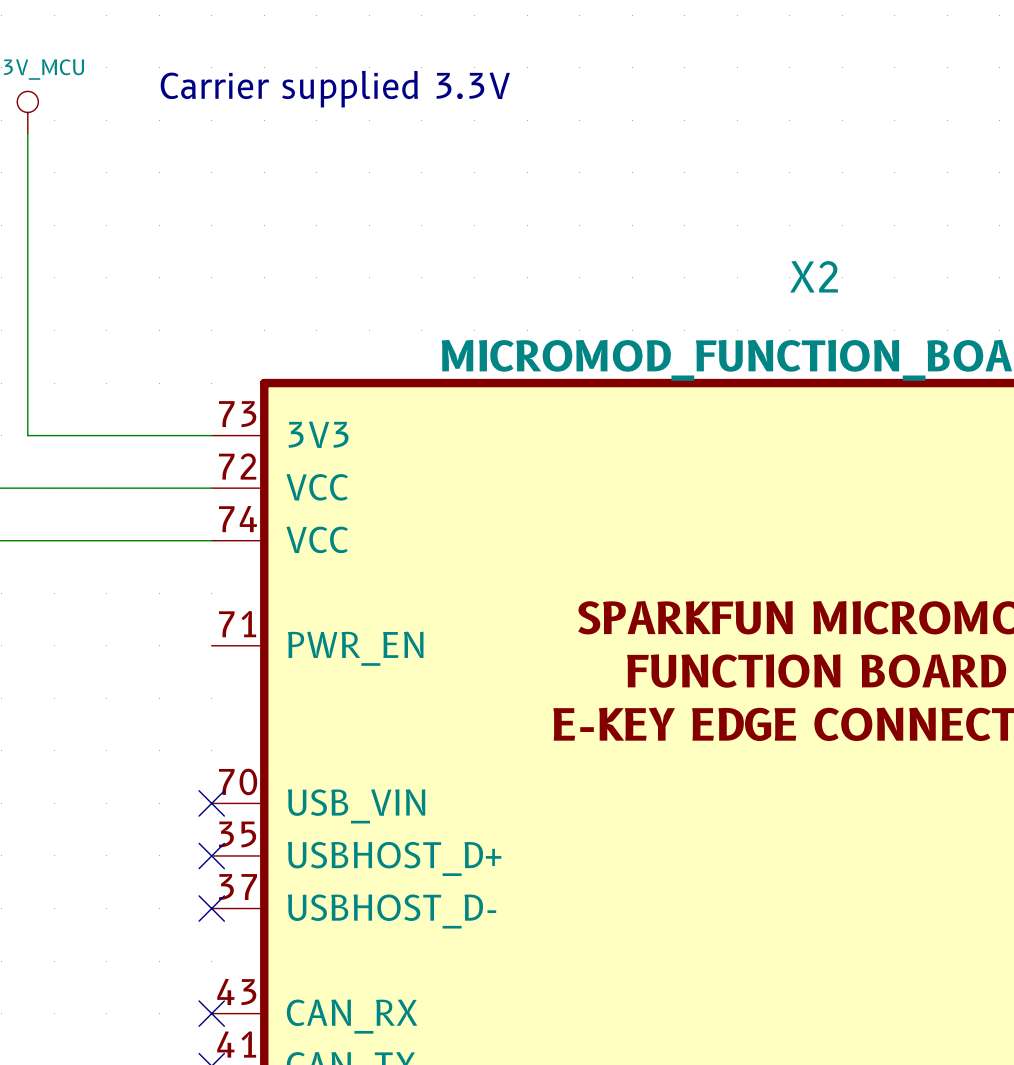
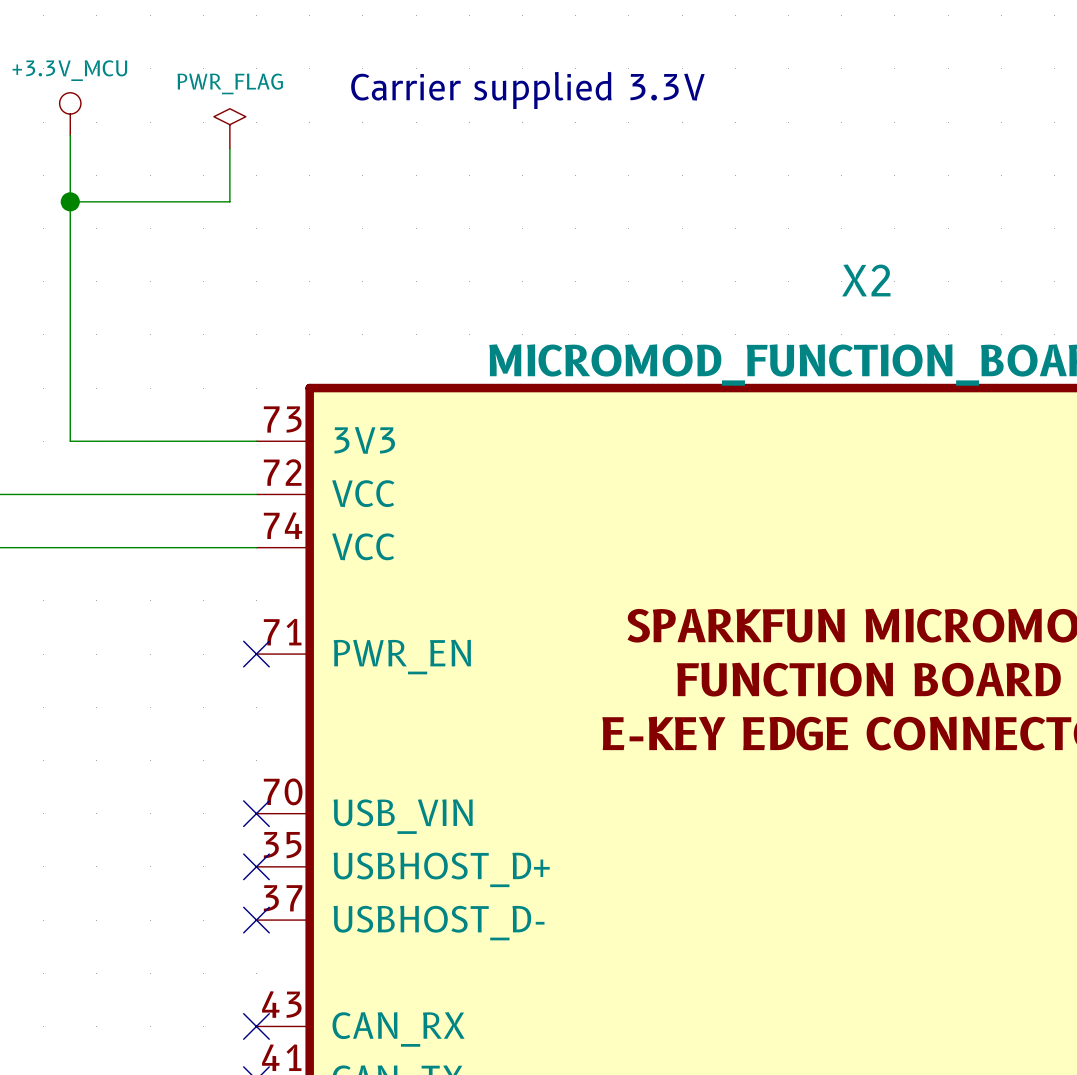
text position: Carrier supplied 3.3V (335, 89) -> Carrier supplied 3.3V (527, 90)
power symbol: none -> PWR_FLAG (229, 128)
wire: none -> (229, 148) (229, 201) (70, 201)
junction: none -> (70, 201)
no-connect mark: none -> (256, 654)

